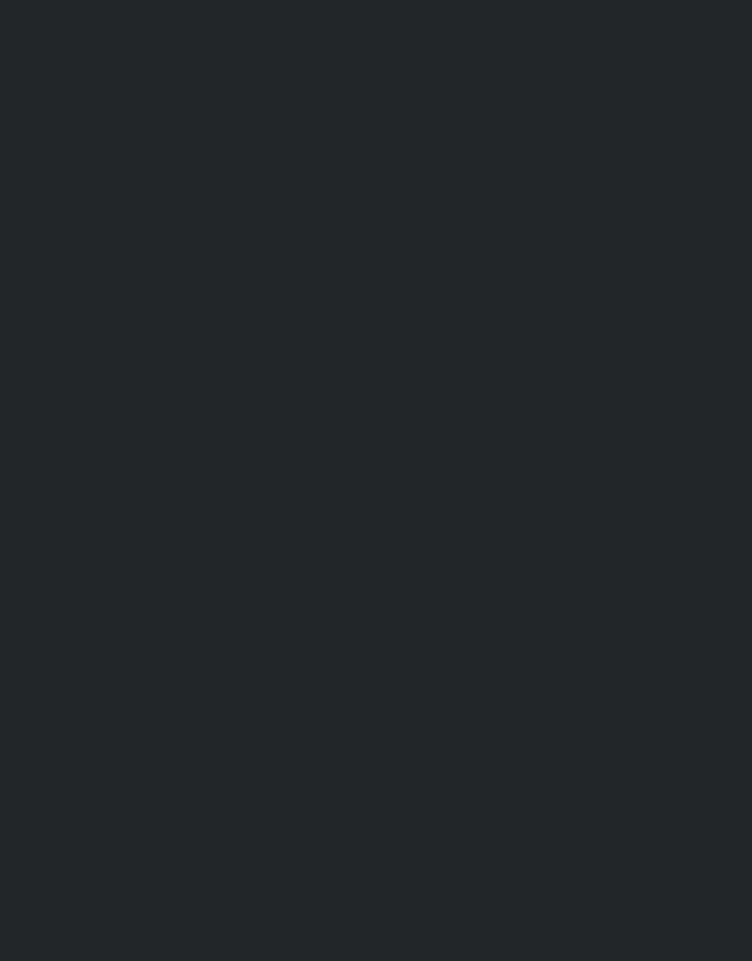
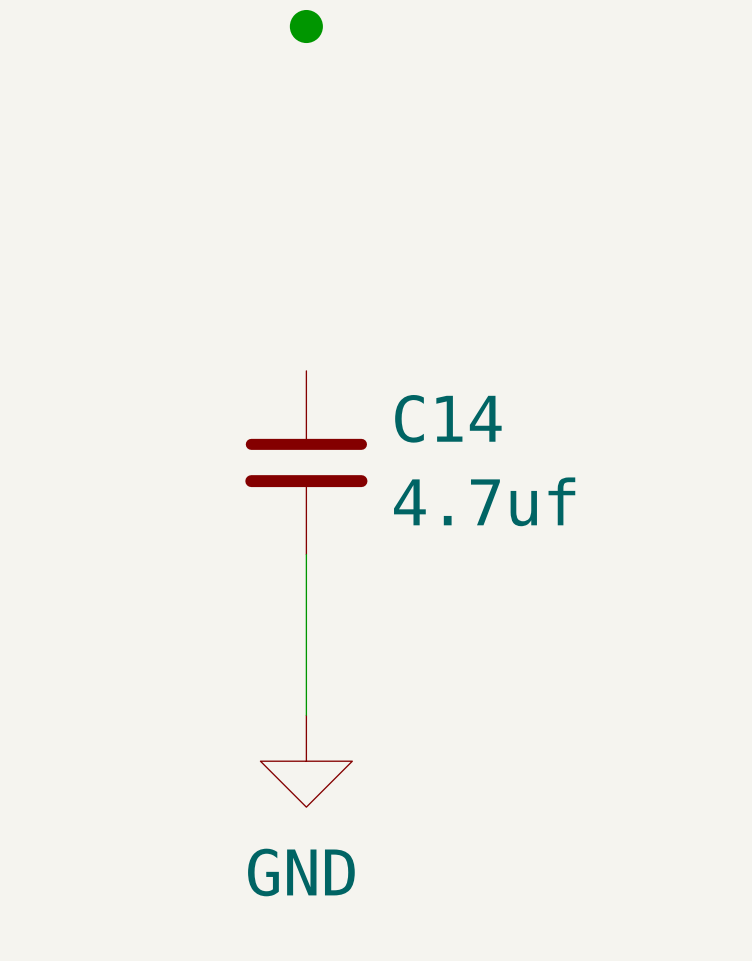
junction: none -> (306, 26)
C14: none -> 4.7uf (306, 462)
wire: none -> (306, 554) (306, 715)
power symbol: none -> GND (306, 761)

